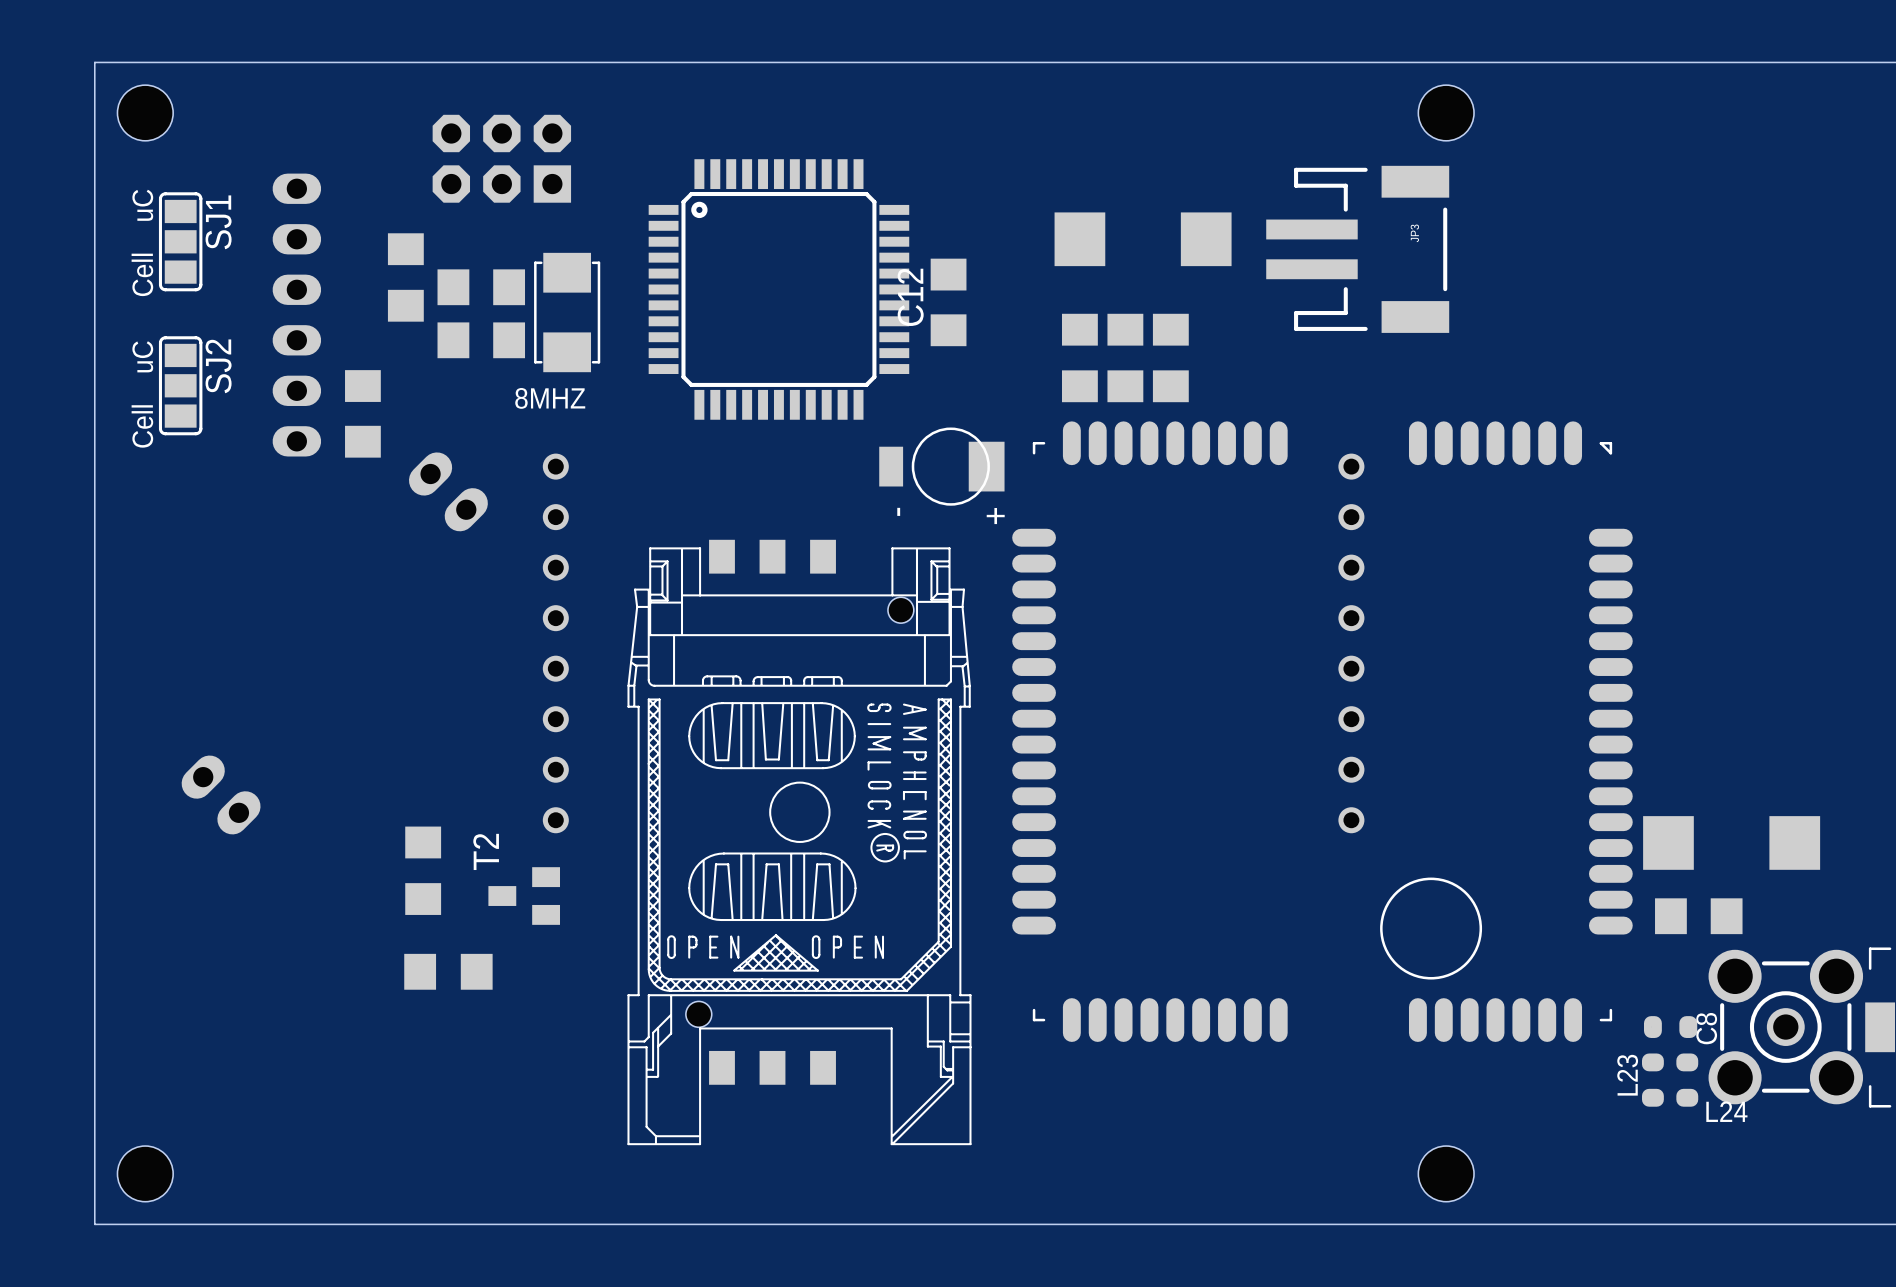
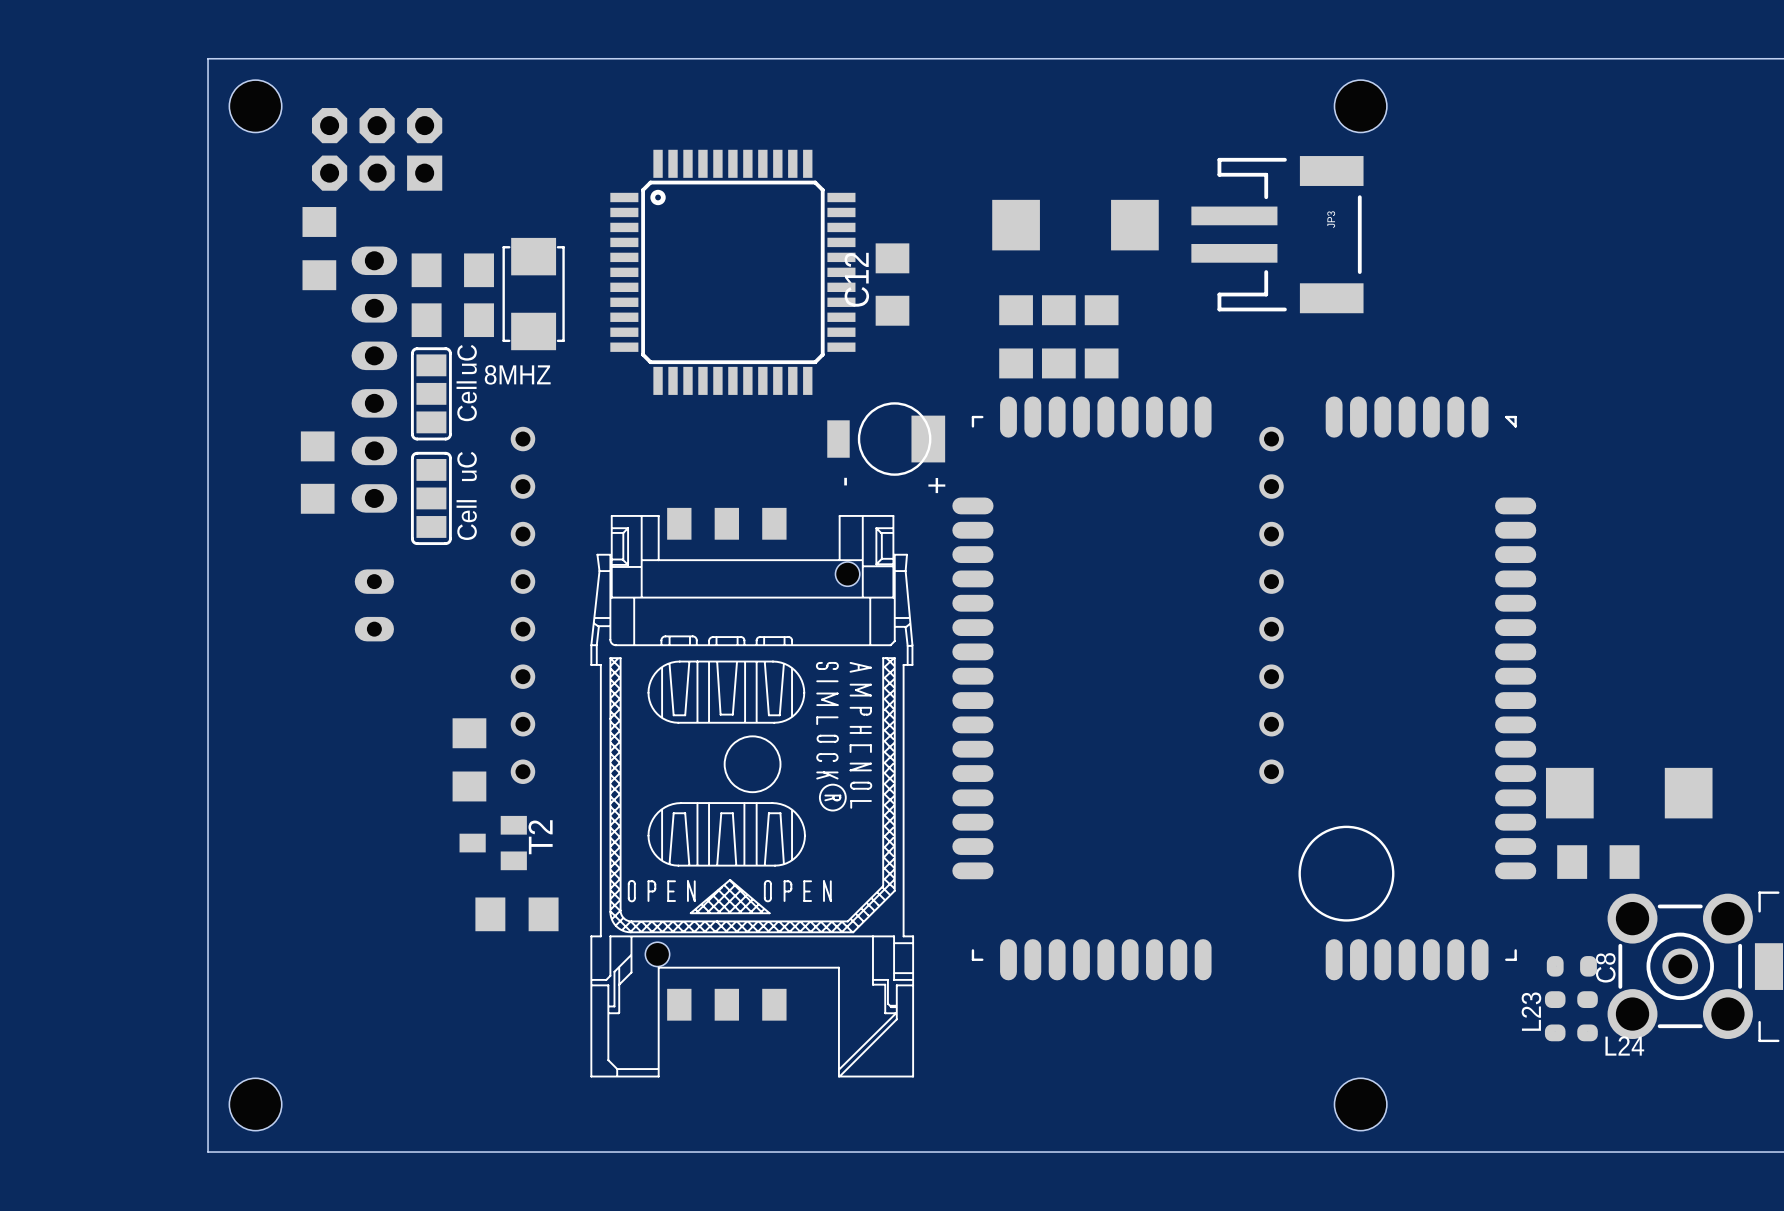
board edge: (221, 62) (94, 62) (94, 1224) (221, 1224) -> (208, 58) (208, 1152)
hole position: (145, 112) -> (255, 106)
part position: (501, 158) -> (377, 149)
text: uC (142, 205) -> none
SJ1: (180, 241) -> none
text: Cell (142, 274) -> none
part position: (405, 277) -> (319, 248)
part position: (296, 315) -> (374, 379)
text: uC (142, 356) -> none
text: none -> uC (467, 359)
SJ2: (180, 385) -> none
part position: (362, 413) -> (317, 472)
part: none -> (431, 393)
text: Cell (142, 426) -> none
text: none -> Cell (466, 401)
part: (448, 491) -> none
text: none -> uC (467, 466)
part: none -> (431, 498)
text: none -> Cell (466, 520)
part: none -> (374, 605)
part: (221, 794) -> none
part: none -> (469, 759)
T2 name position: T2 (486, 851) -> T2 (540, 837)
part: (423, 870) -> none
part: (448, 971) -> none
part: none -> (516, 914)
hole position: (145, 1173) -> (255, 1104)

